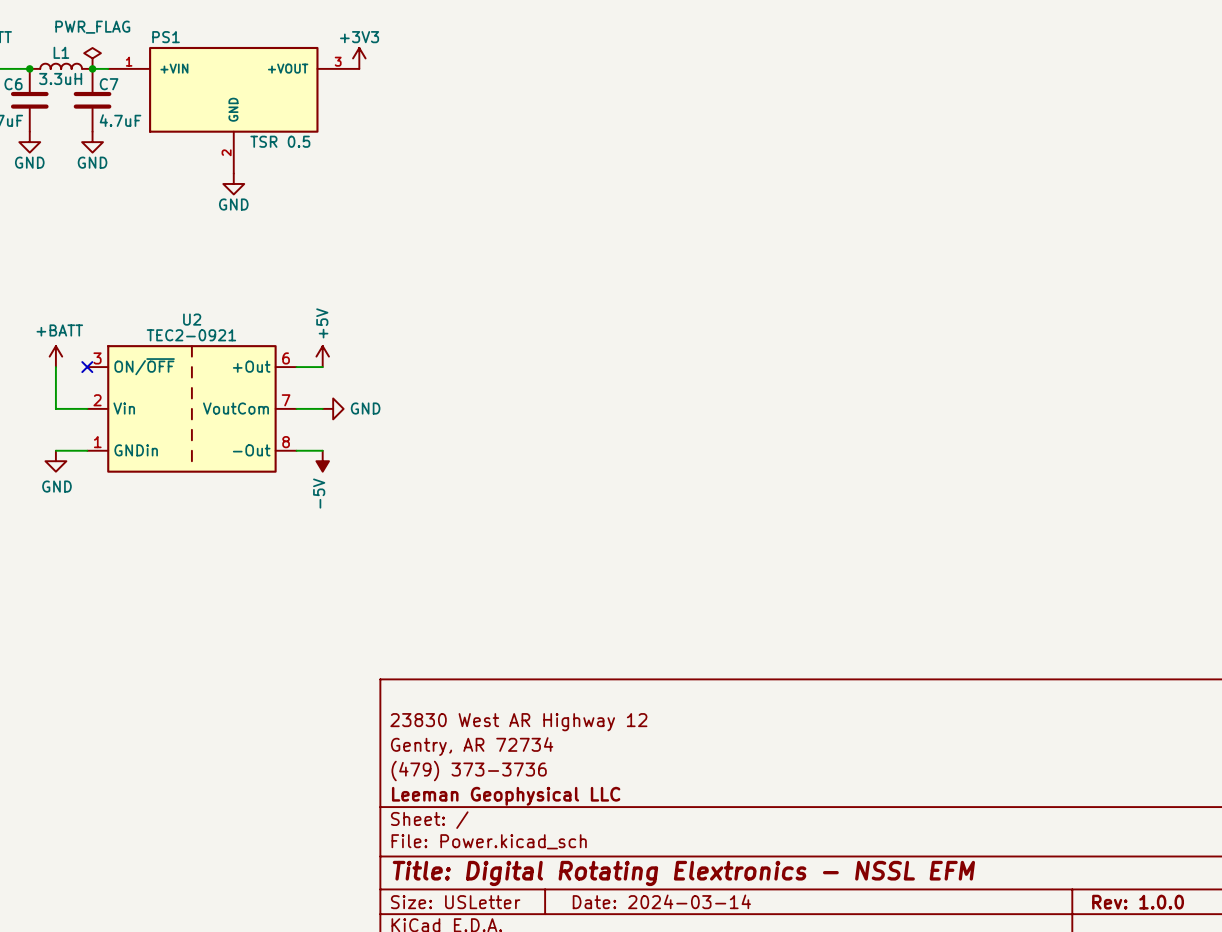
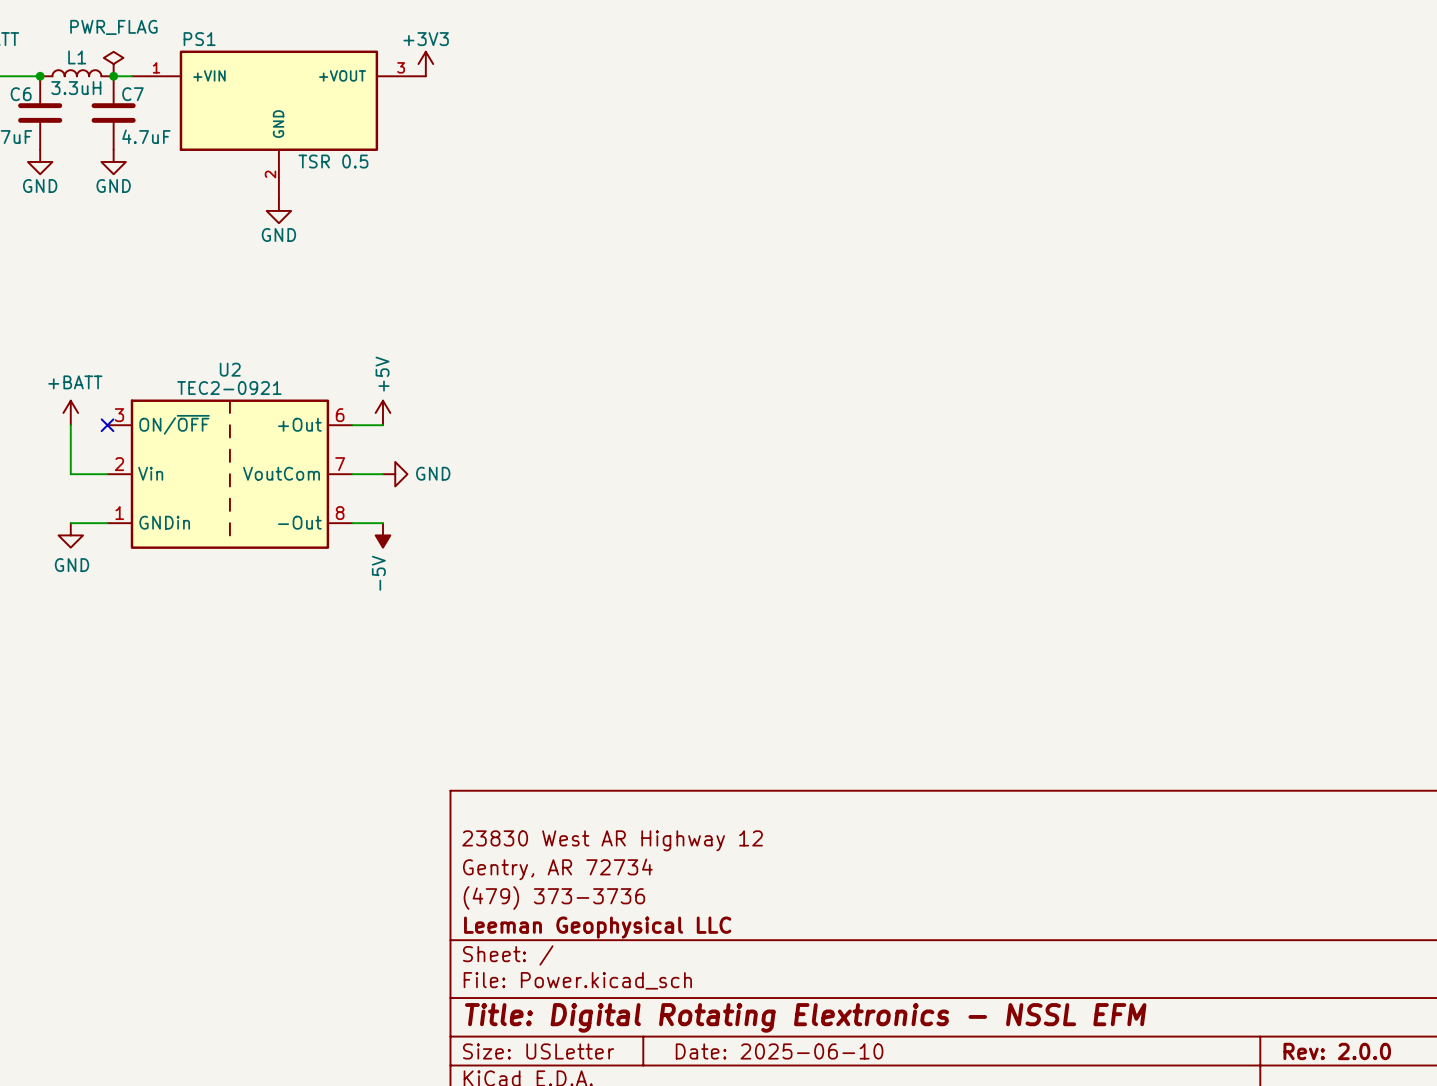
title block: Date: 2024-03-14 (661, 901) -> Date: 2025-06-10 (779, 1051)
title block: Rev: 1.0.0 (1138, 902) -> Rev: 2.0.0 (1337, 1051)

